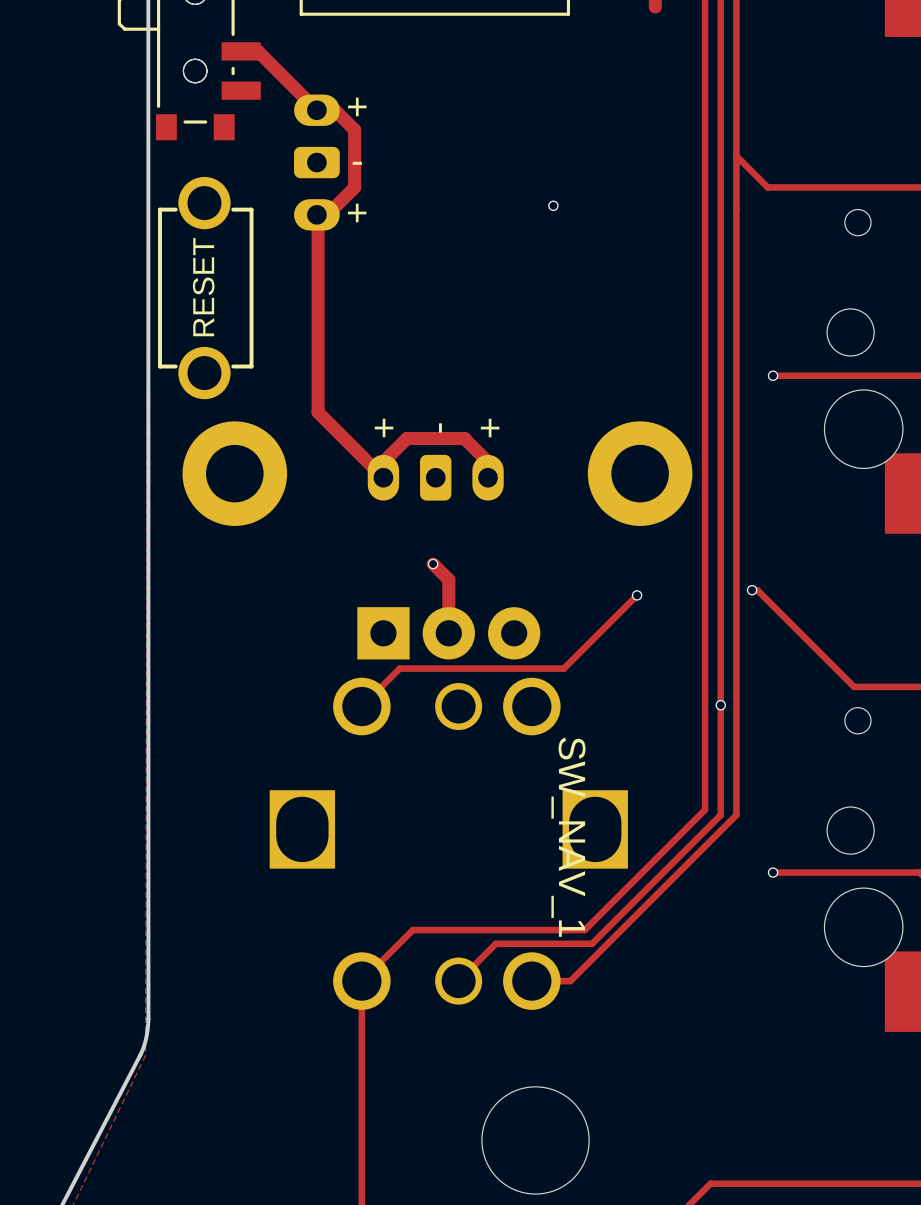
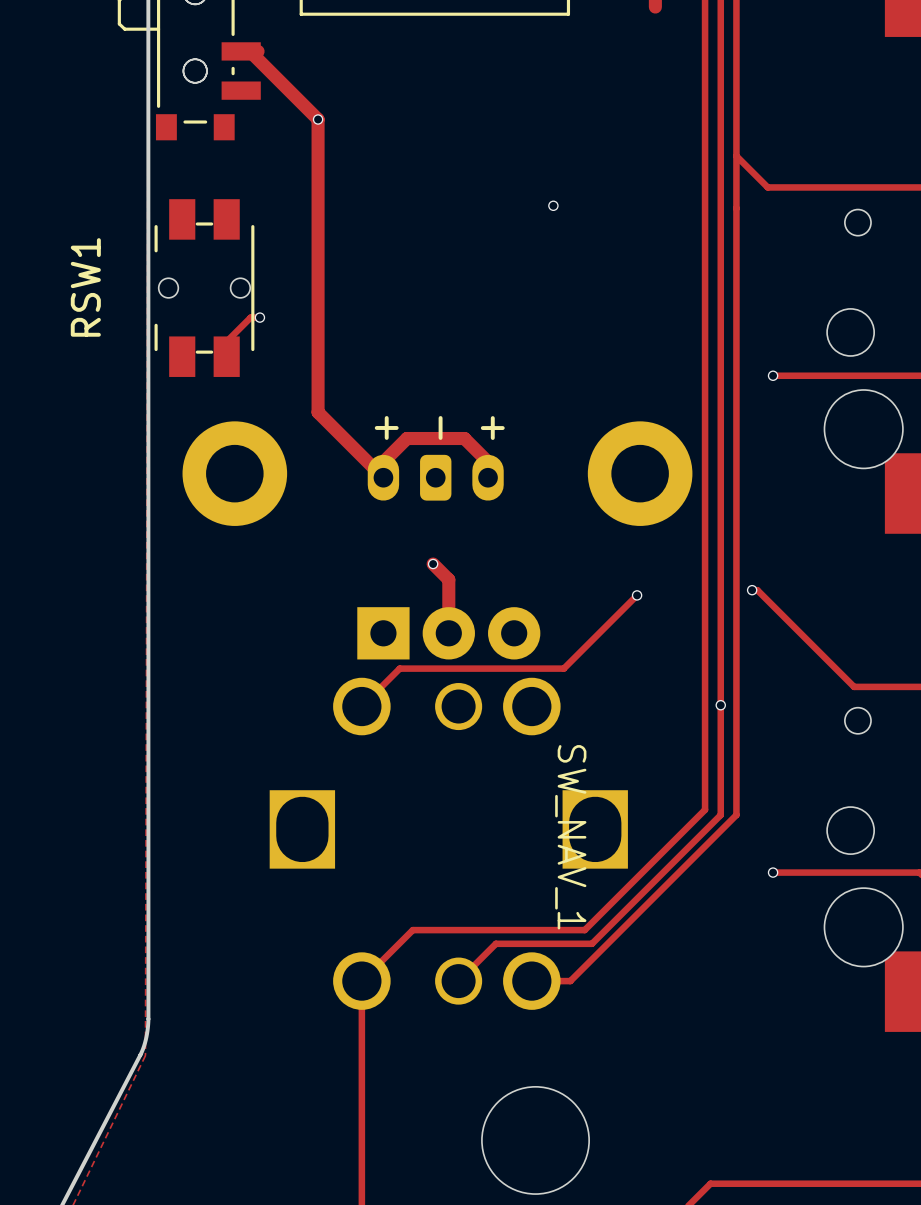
track: (258, 51) (316, 110) (334, 110) (354, 129) (354, 187) (327, 214) (316, 214) (318, 216) -> (249, 51) (318, 119) (318, 216)
text: + (357, 106) -> none
via: none -> (318, 119)
part: (316, 162) -> none
text: - (357, 163) -> none
text: + (357, 212) -> none
RSW1: none -> (204, 288)
part: (205, 288) -> none
track: none -> (259, 317) (250, 317) (226, 341) (226, 356)
via: none -> (259, 317)

